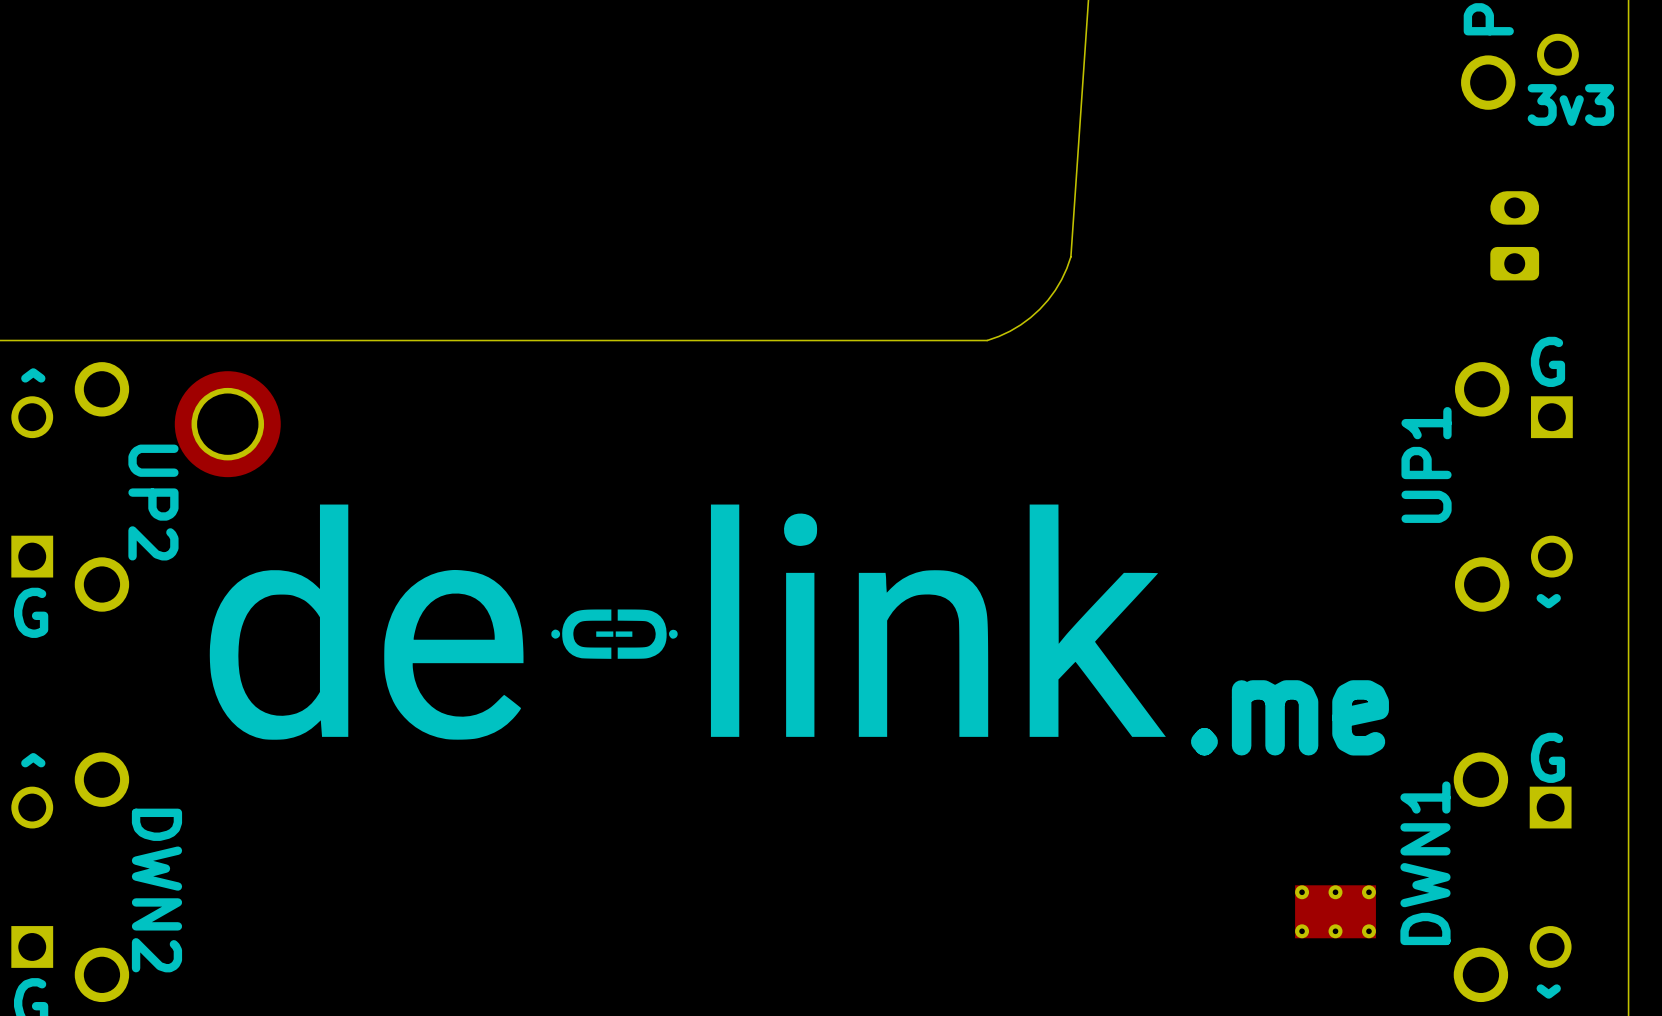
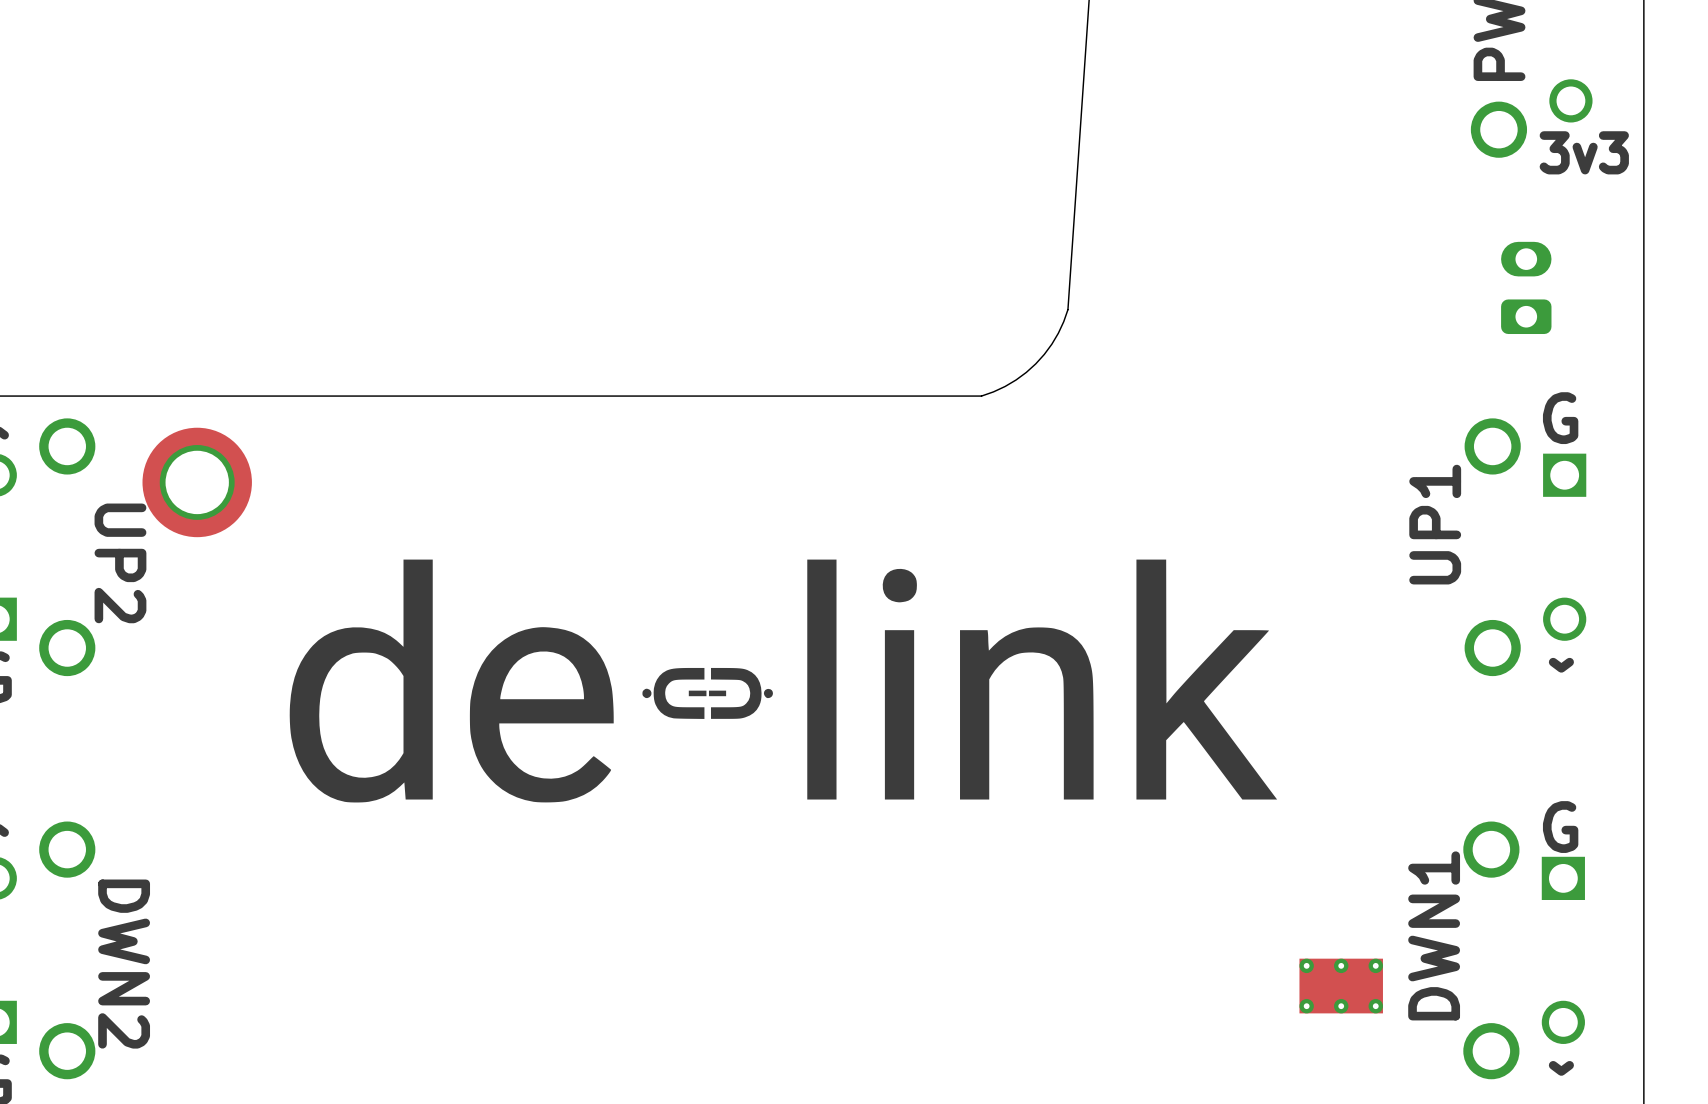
drawing position: (687, 622) -> (783, 681)
text: .me (1289, 717) -> none

